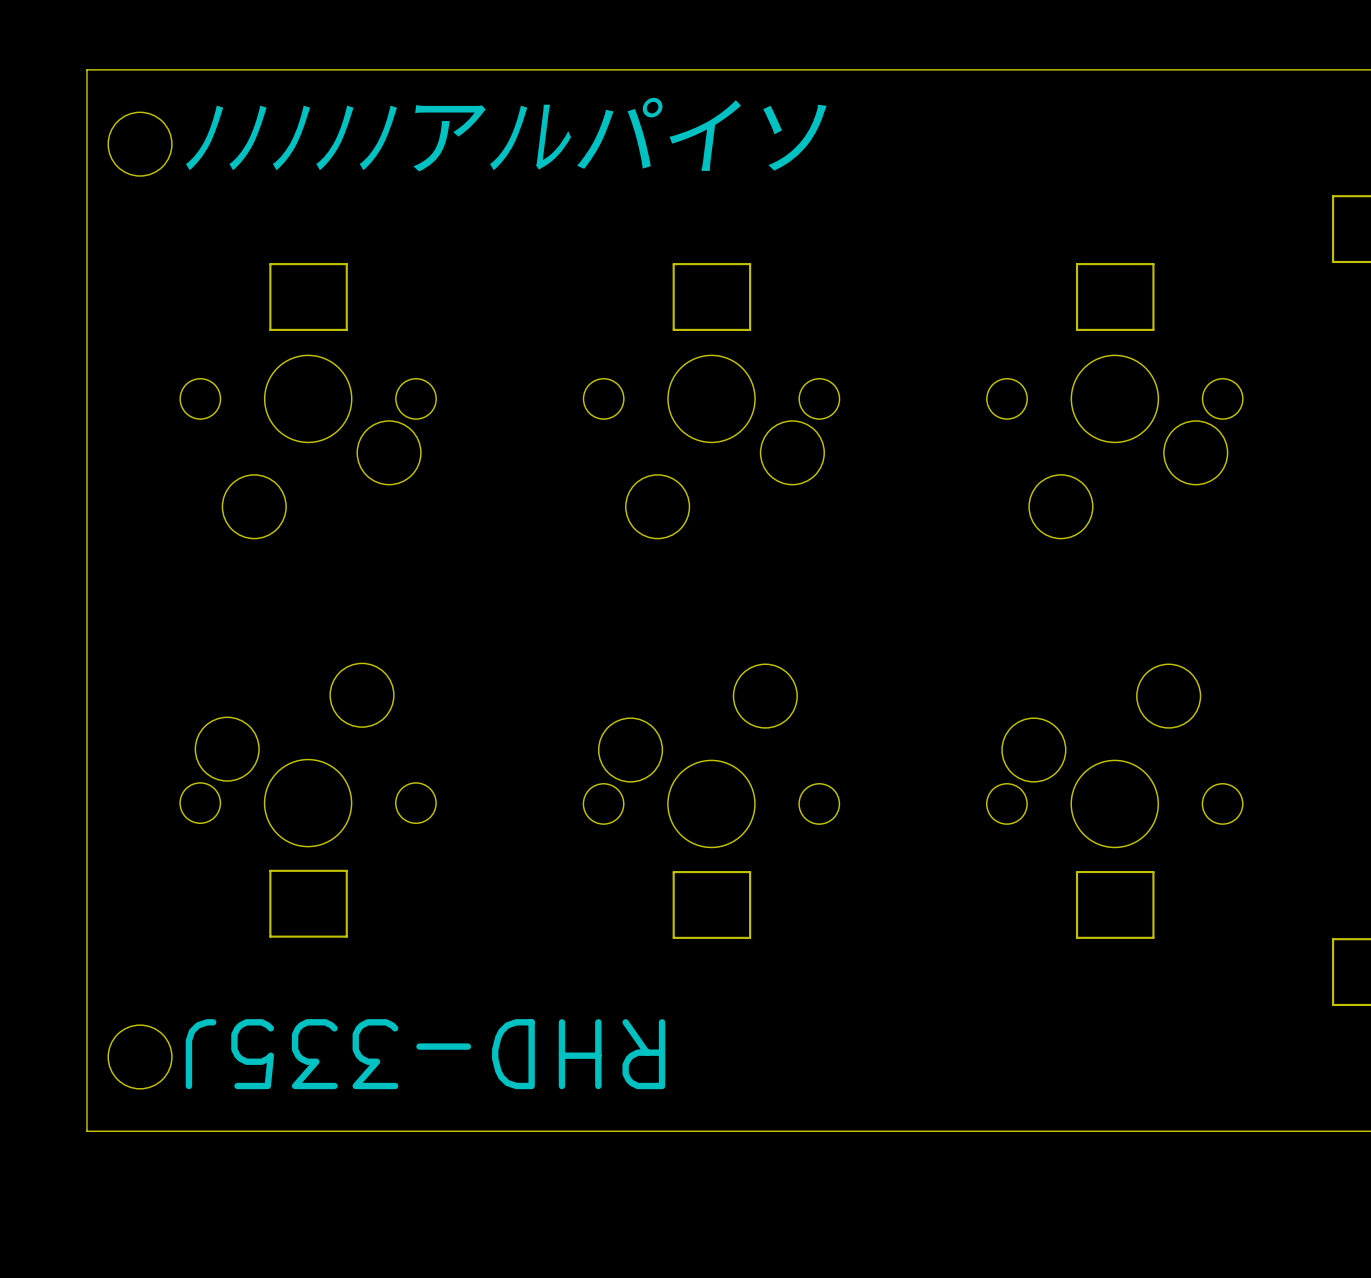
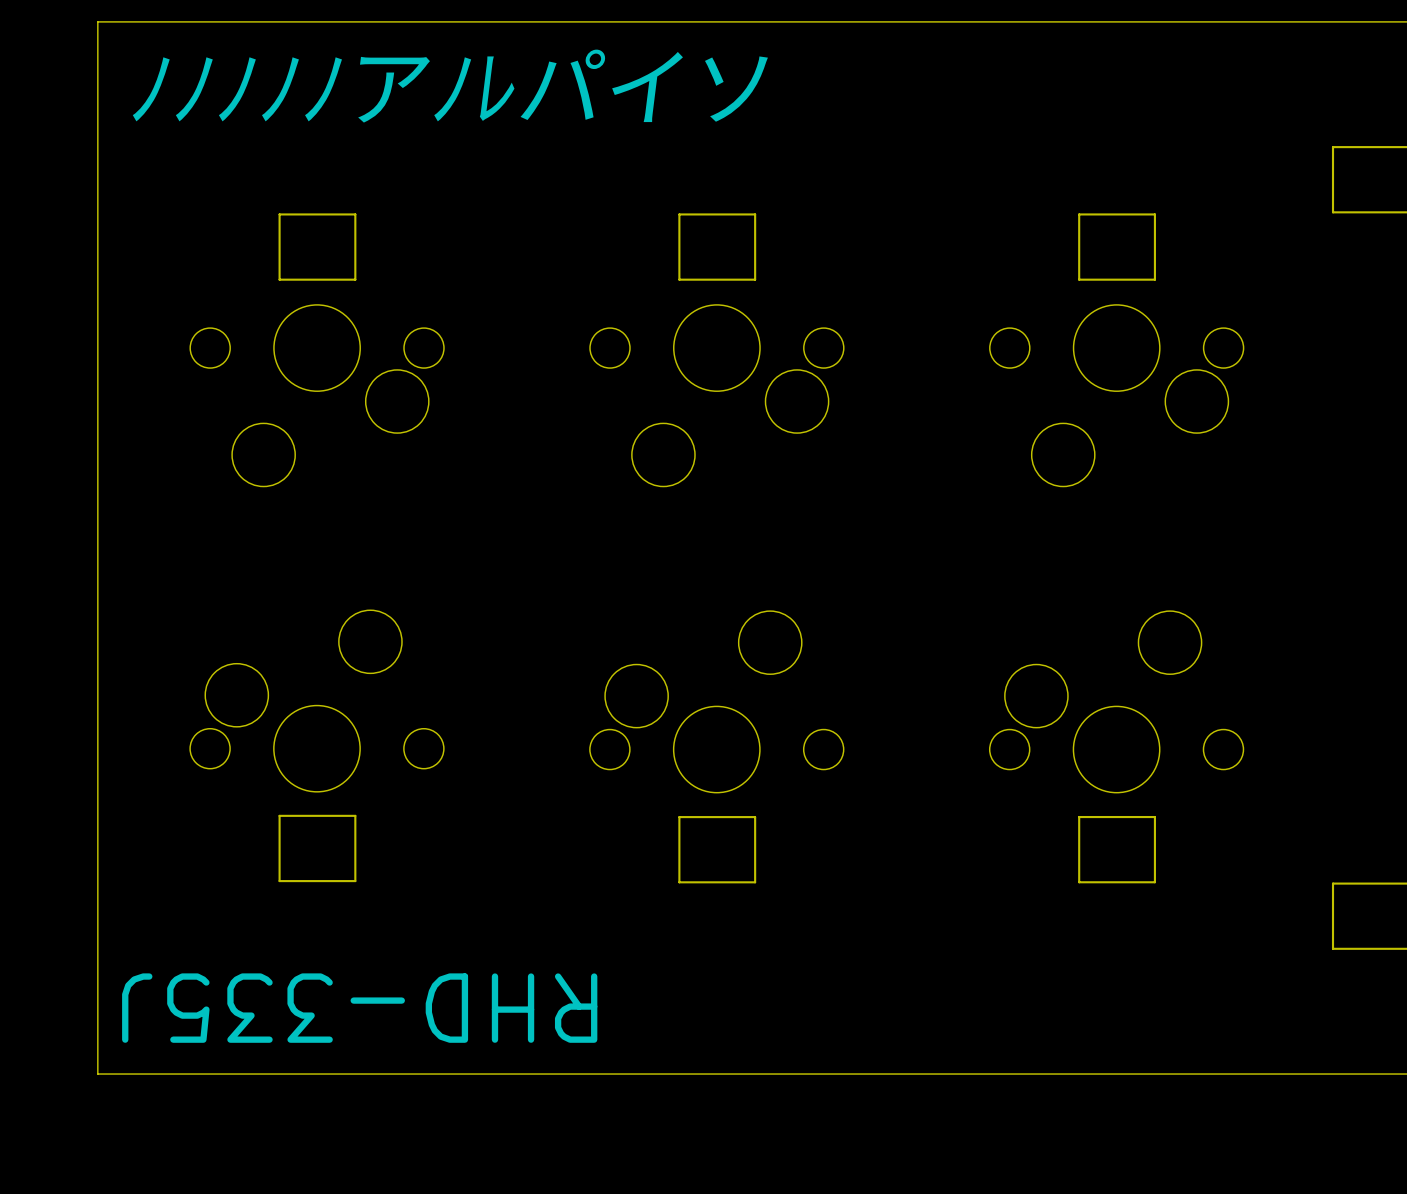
round board edge: [107, 111, 173, 177] -> none
text position: ﾉﾉﾉﾉﾉアﾉﾚパイソ (506, 134) -> ﾉﾉﾉﾉﾉアﾉﾚパイソ (450, 86)
round board edge: [107, 1024, 173, 1090] -> none
text position: RHD-335J (425, 1054) -> RHD-335J (359, 1008)

